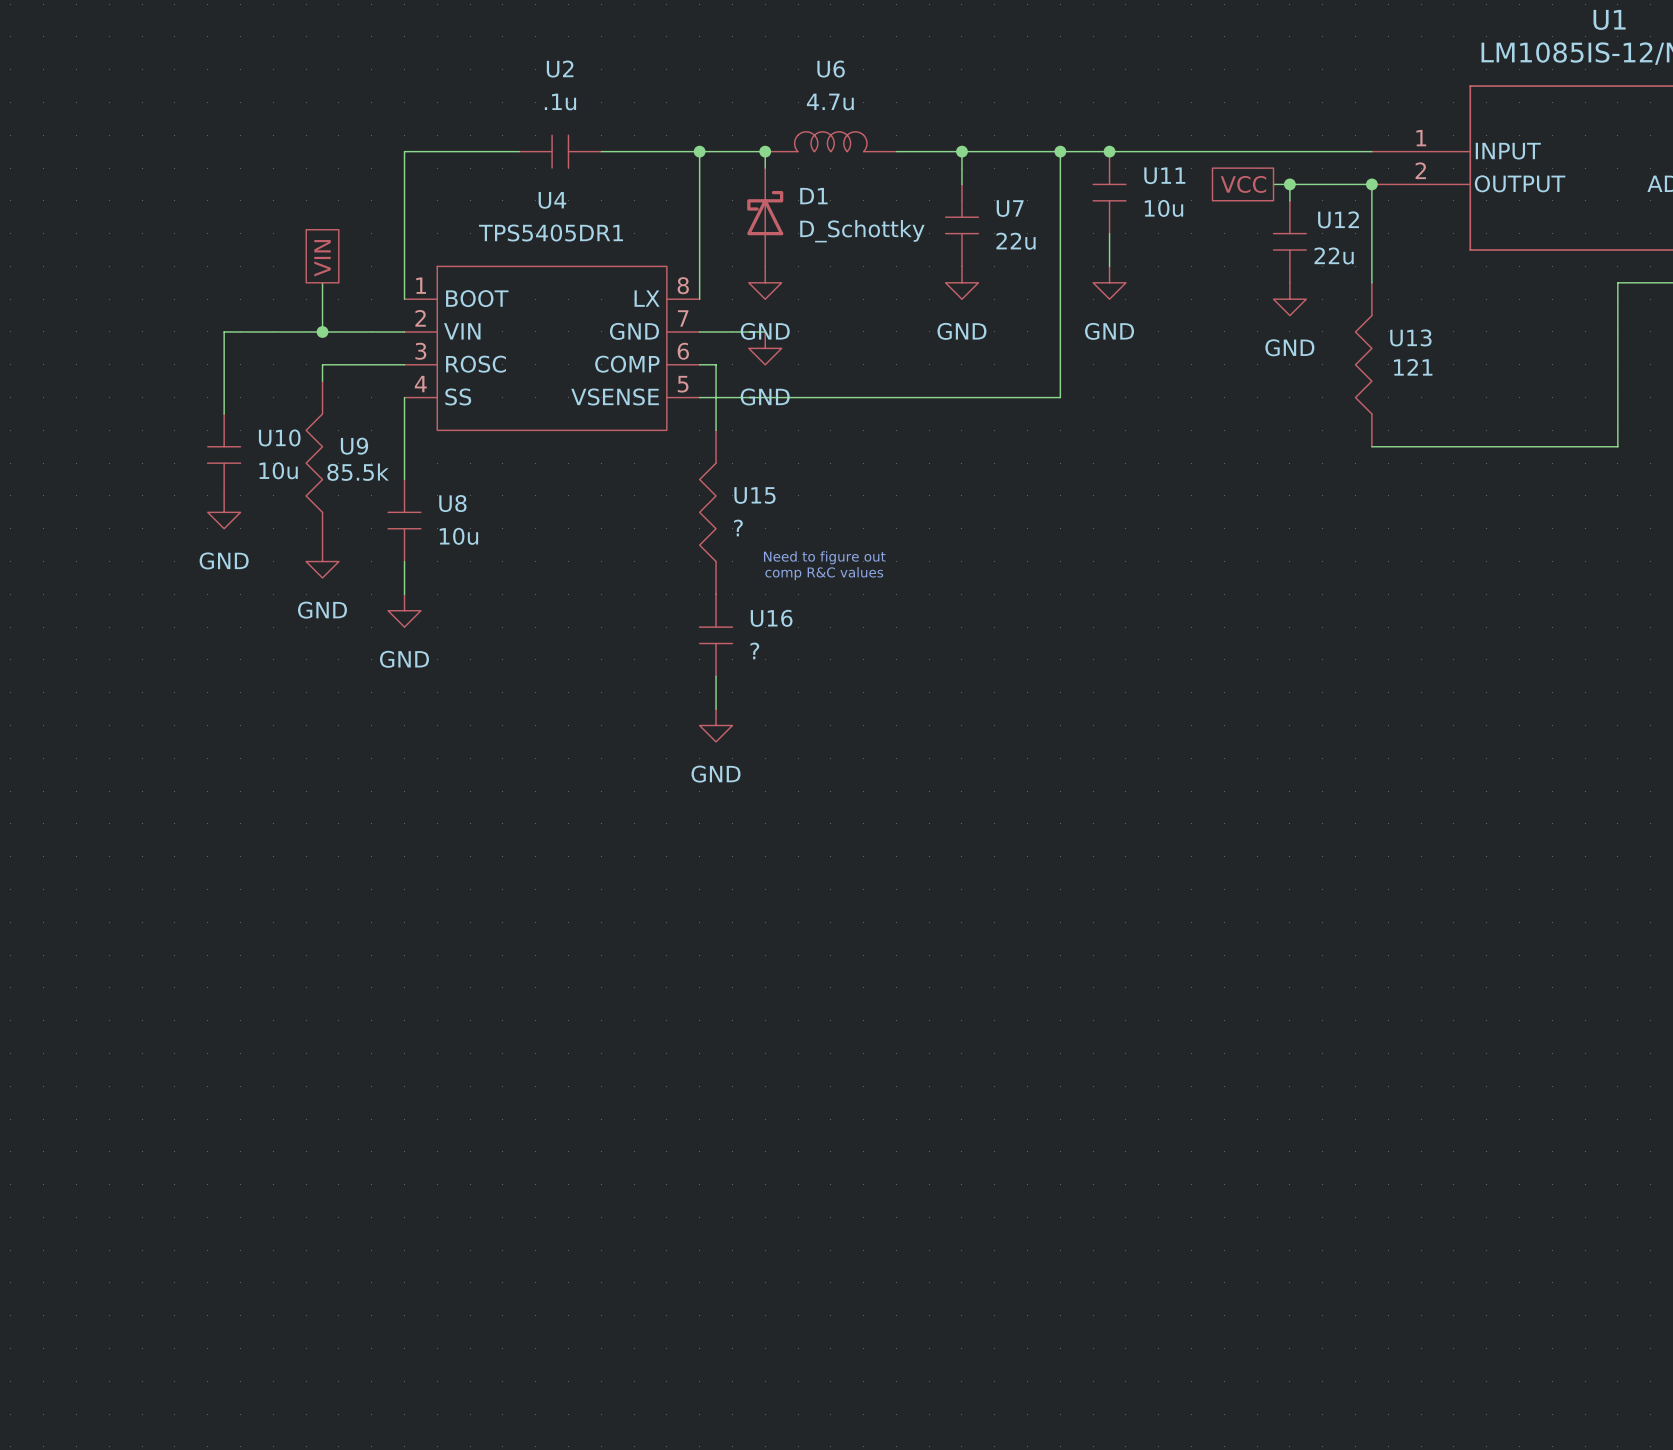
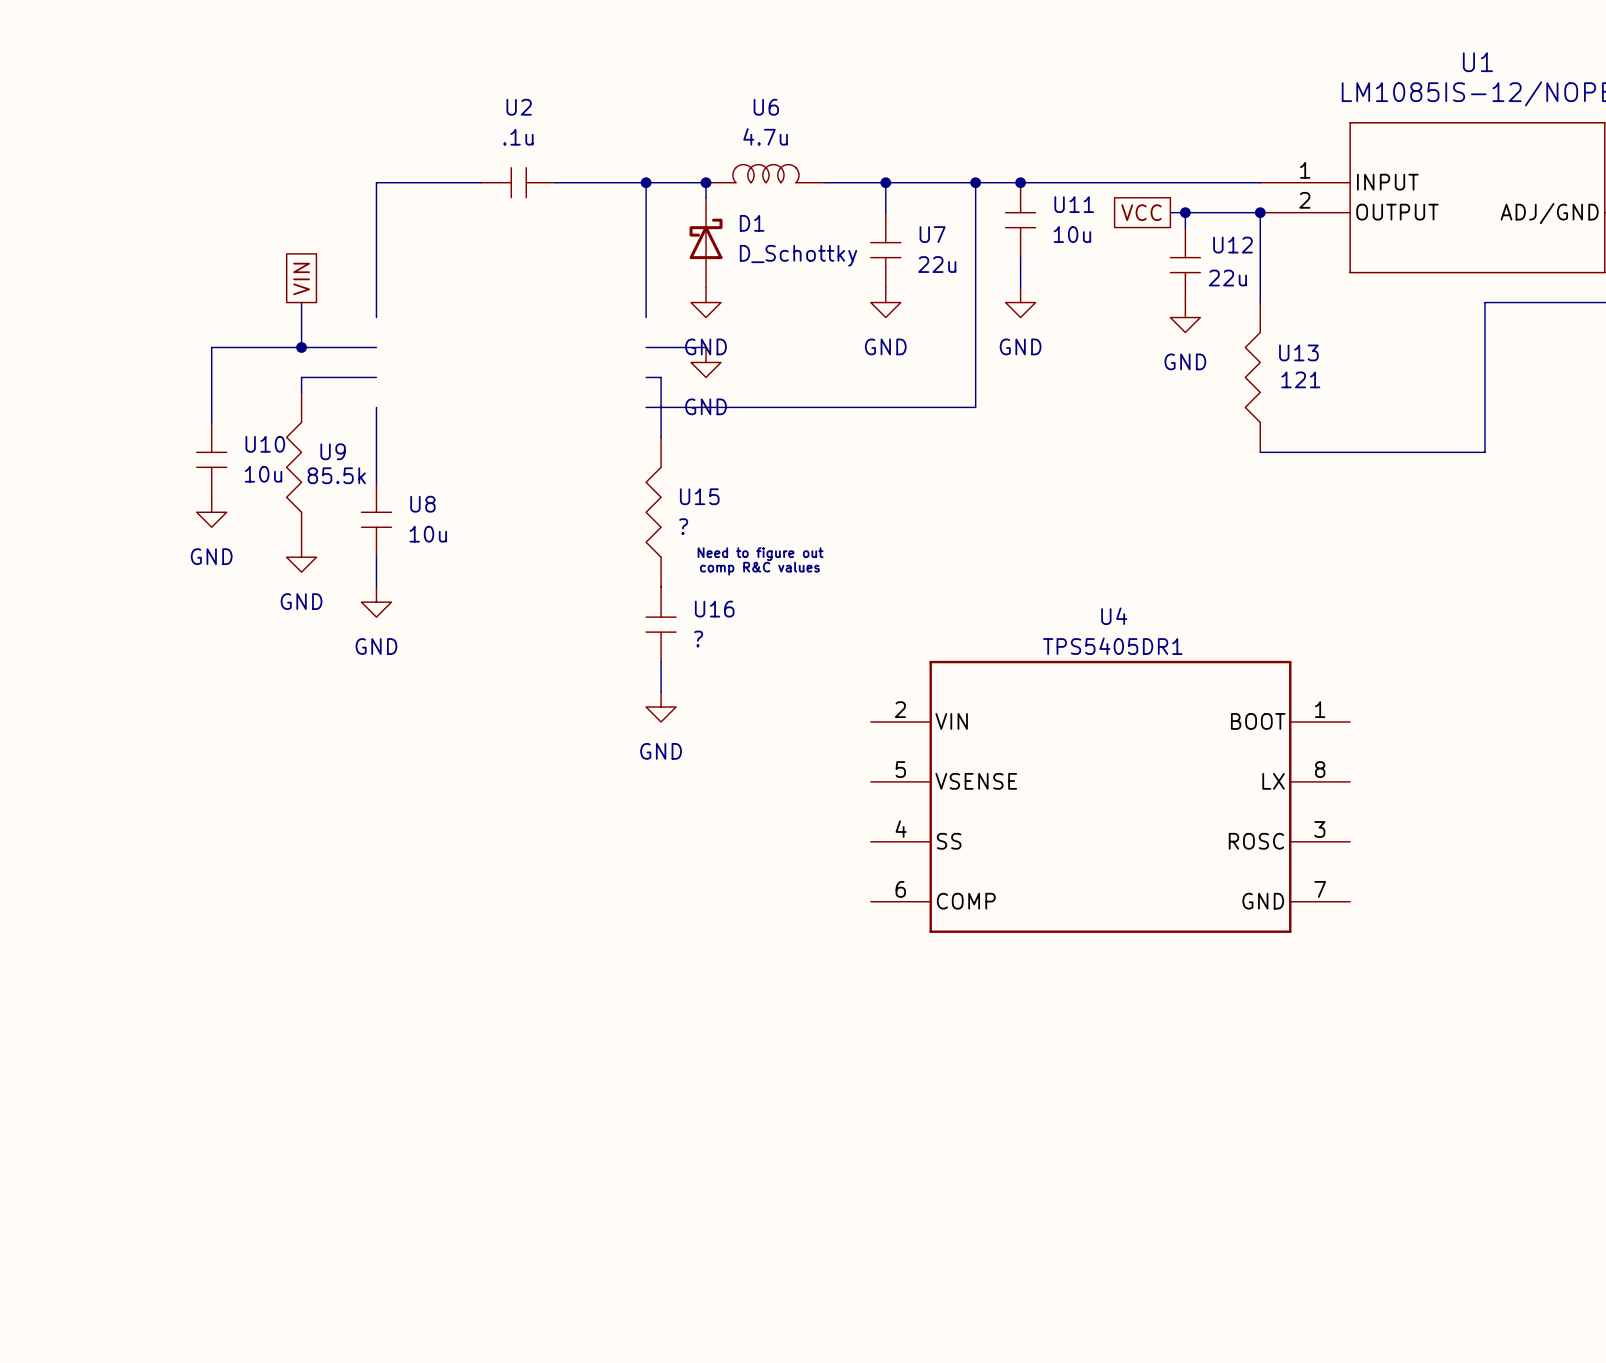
U4 name position: U4 (552, 200) -> U4 (1114, 616)
U4 value position: TPS5405DR1 (551, 233) -> TPS5405DR1 (1112, 646)
U4 symbol: [404, 266, 700, 431] -> [870, 660, 1351, 933]

